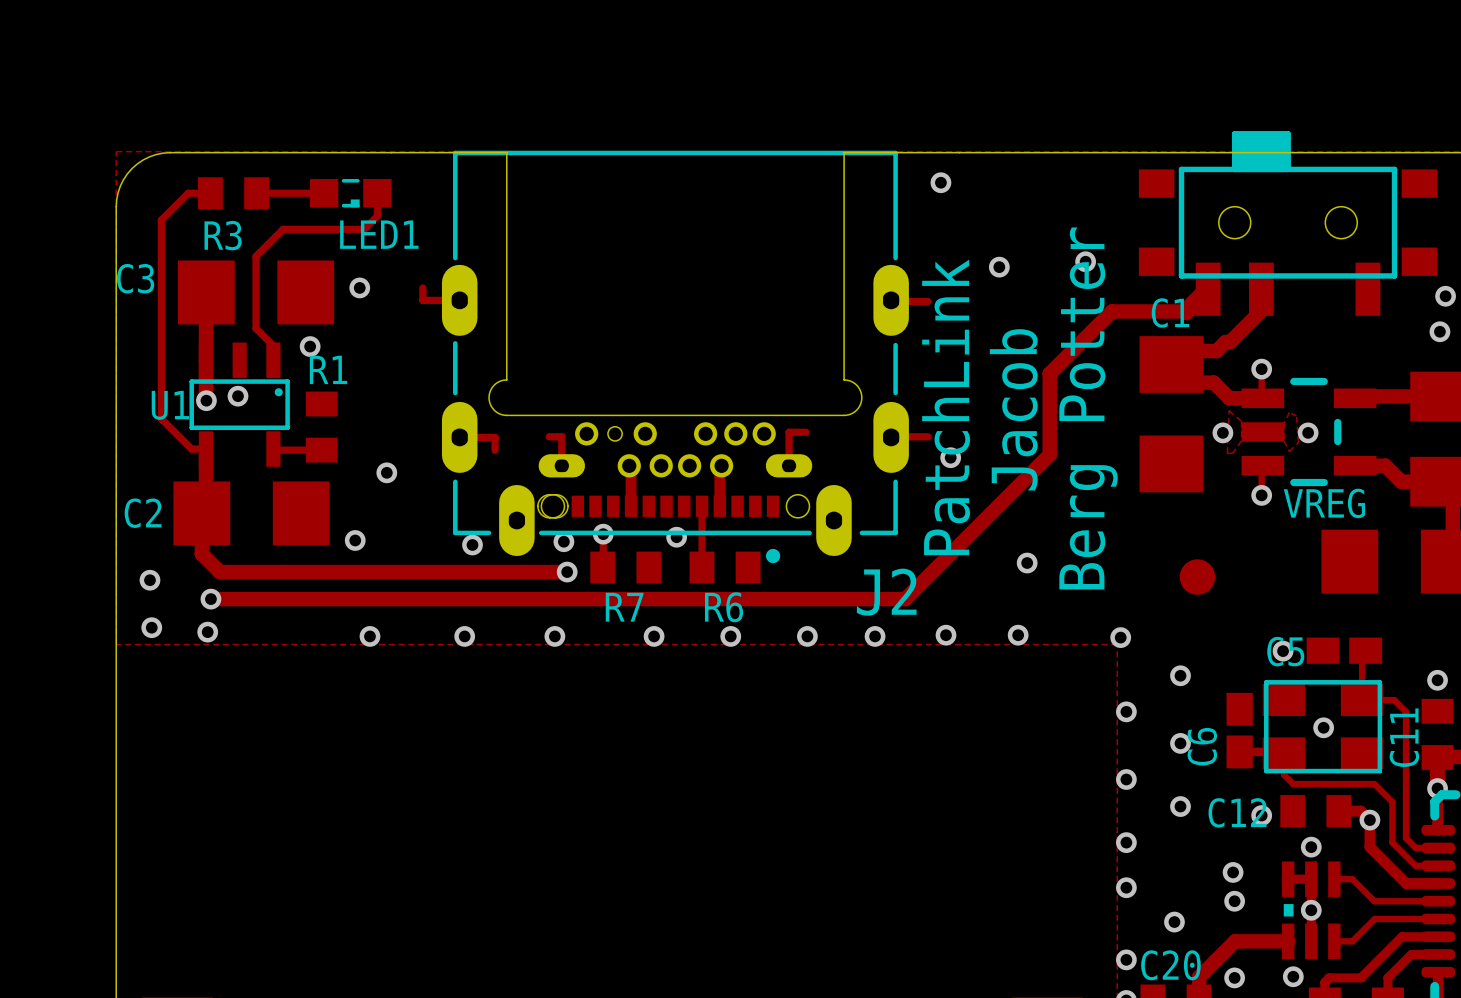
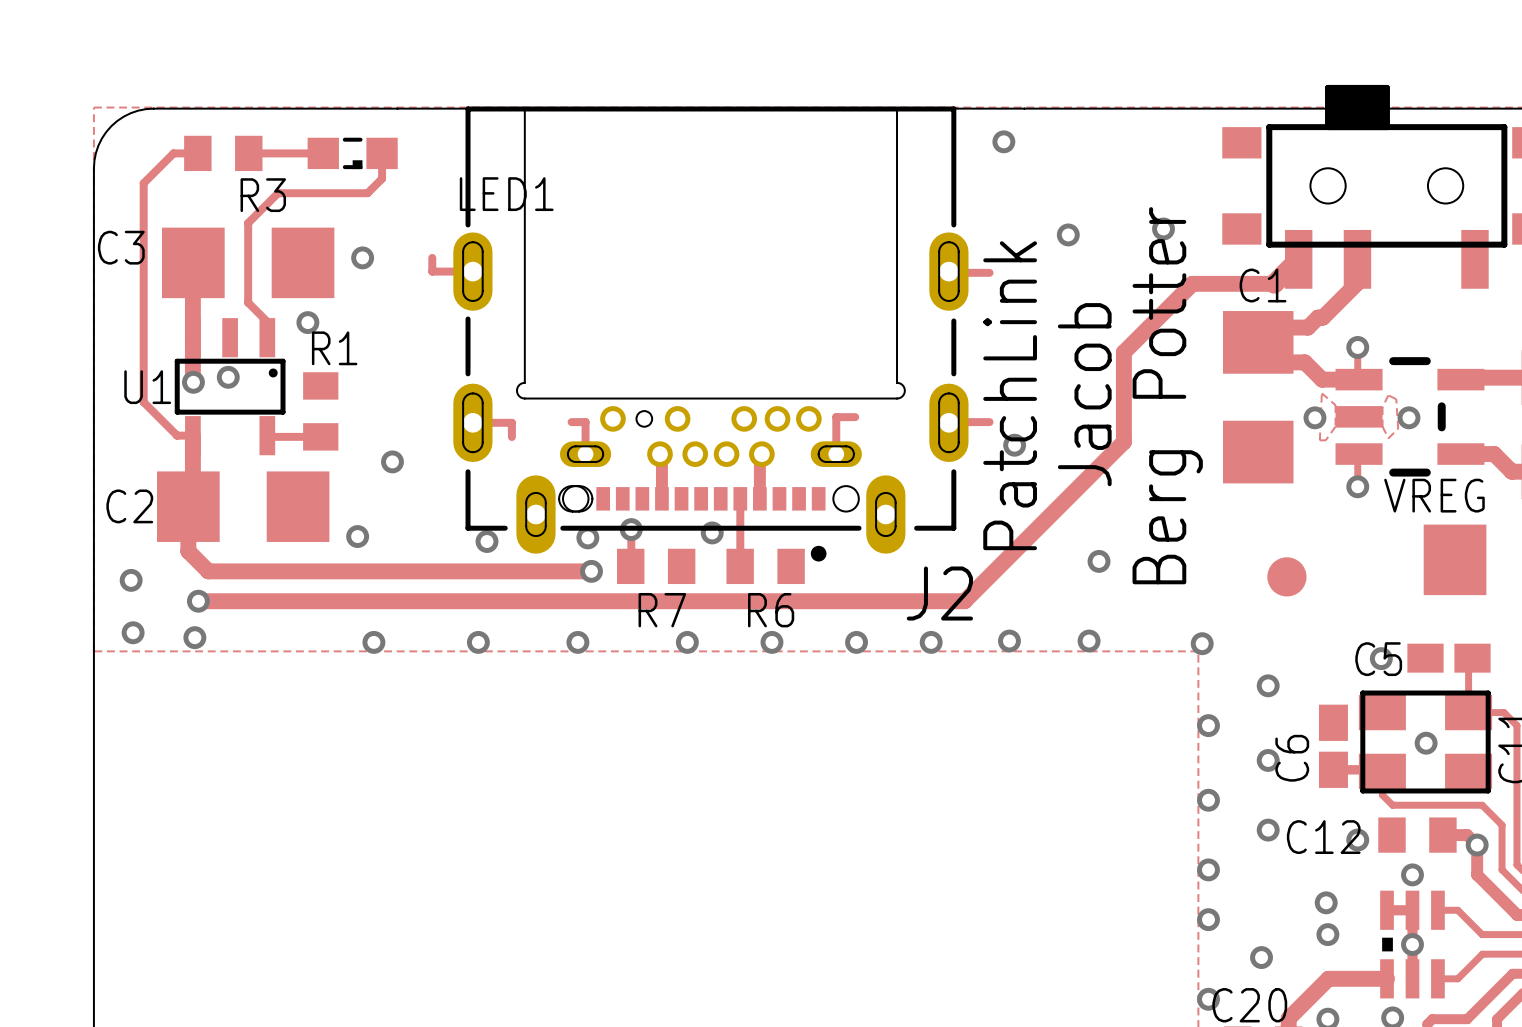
J2 footprint: [391, 150, 960, 564] -> [397, 106, 1025, 562]
LED1 name position: LED1 (379, 234) -> LED1 (506, 194)
R3 name position: R3 (223, 235) -> R3 (263, 195)

